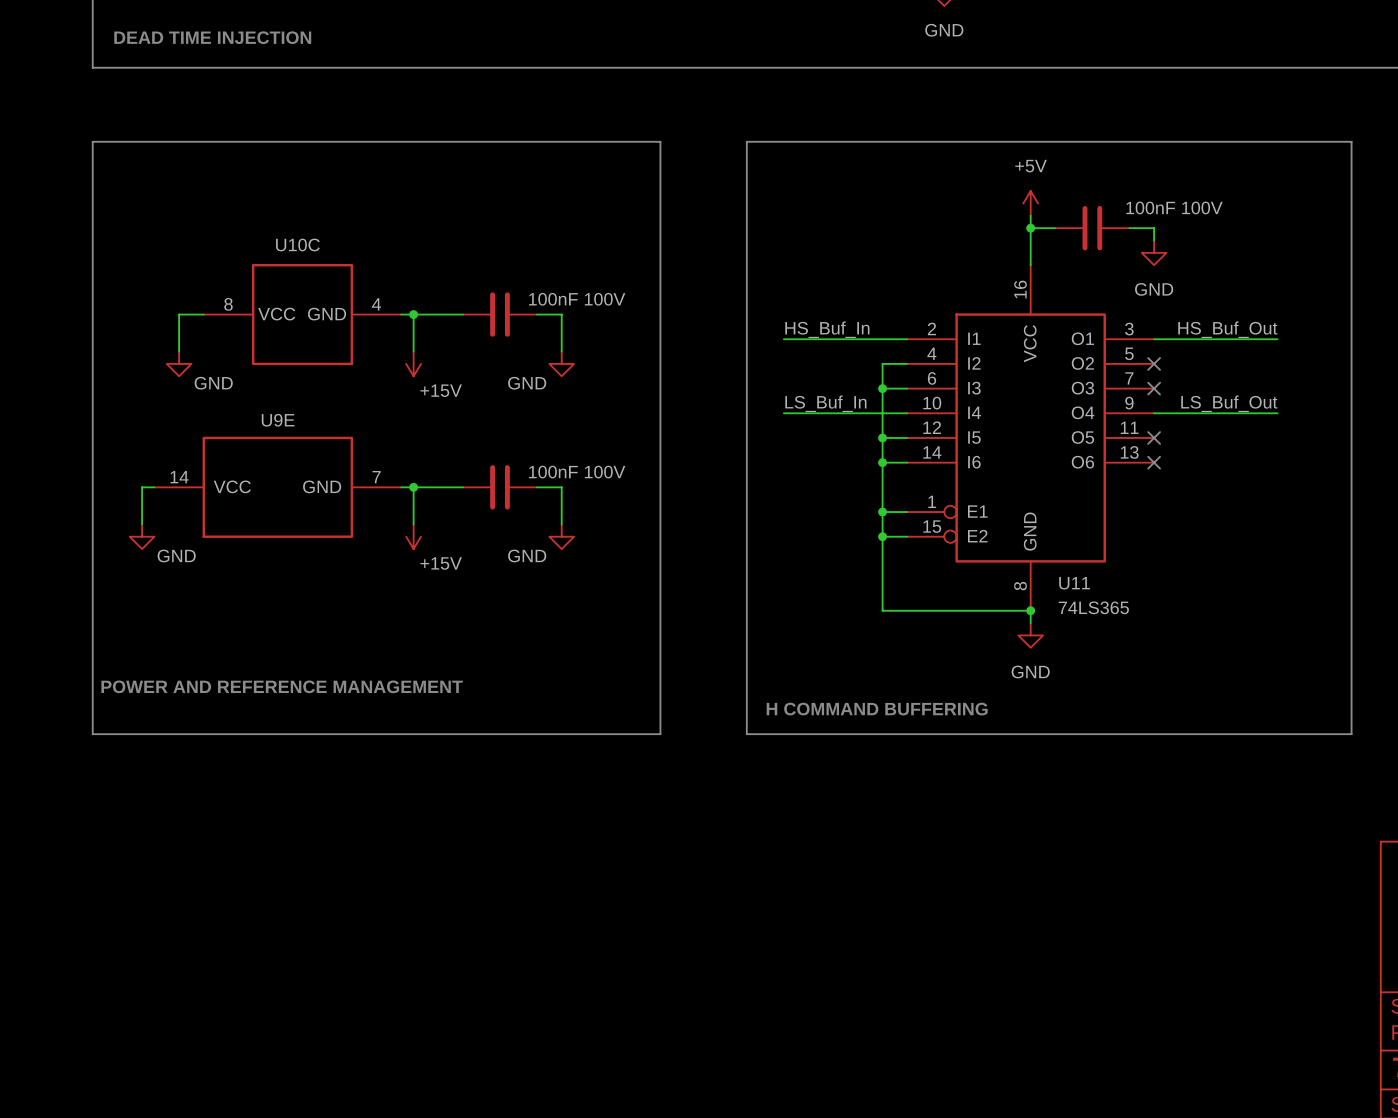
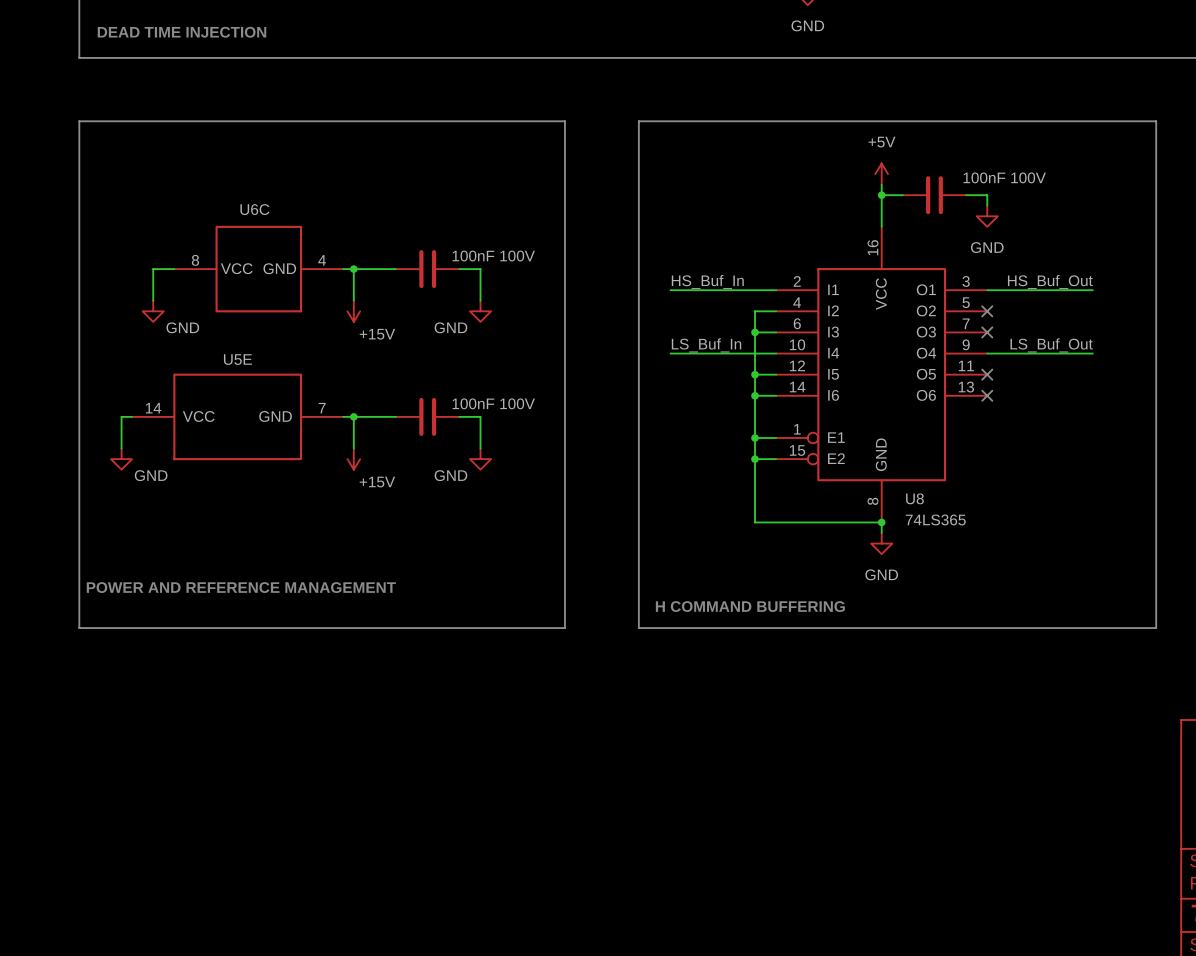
U10C name: U10C (297, 244) -> U6C (254, 209)
U9E name: U9E (278, 420) -> U5E (237, 359)
U11 name: U11 (1074, 583) -> U8 (914, 498)

